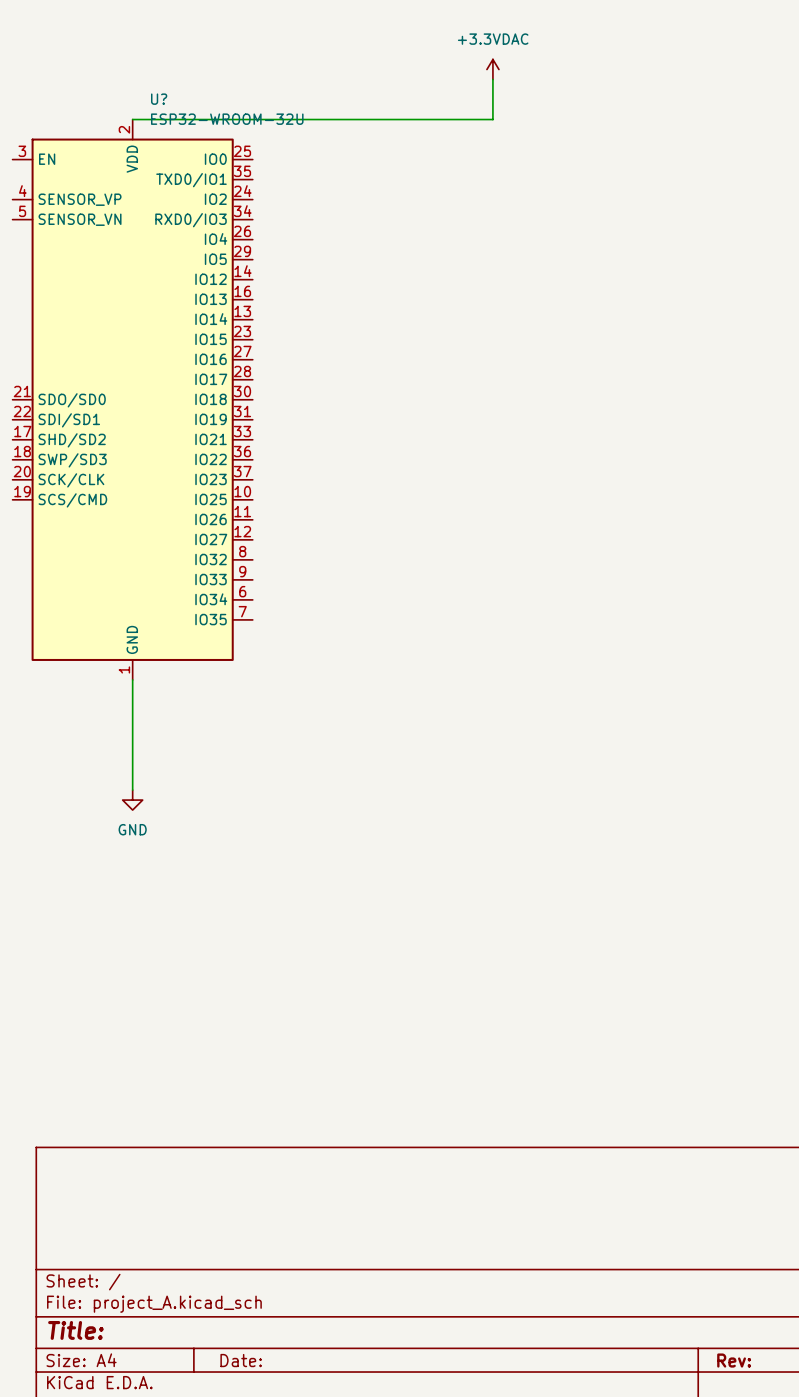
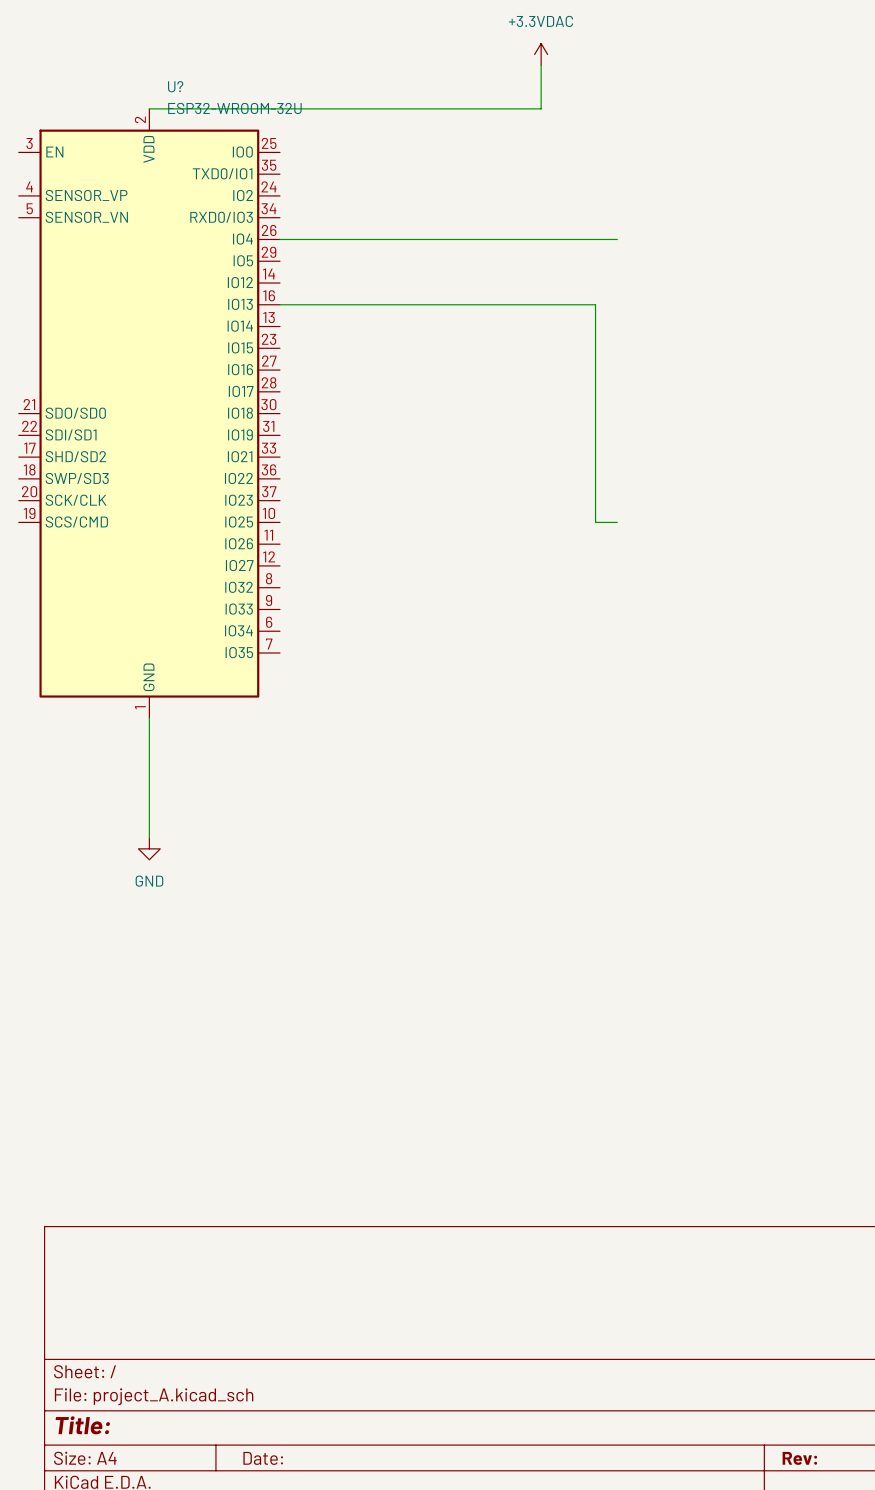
wire: none -> (279, 239) (617, 239)
wire: none -> (279, 304) (595, 304) (595, 522) (617, 522)

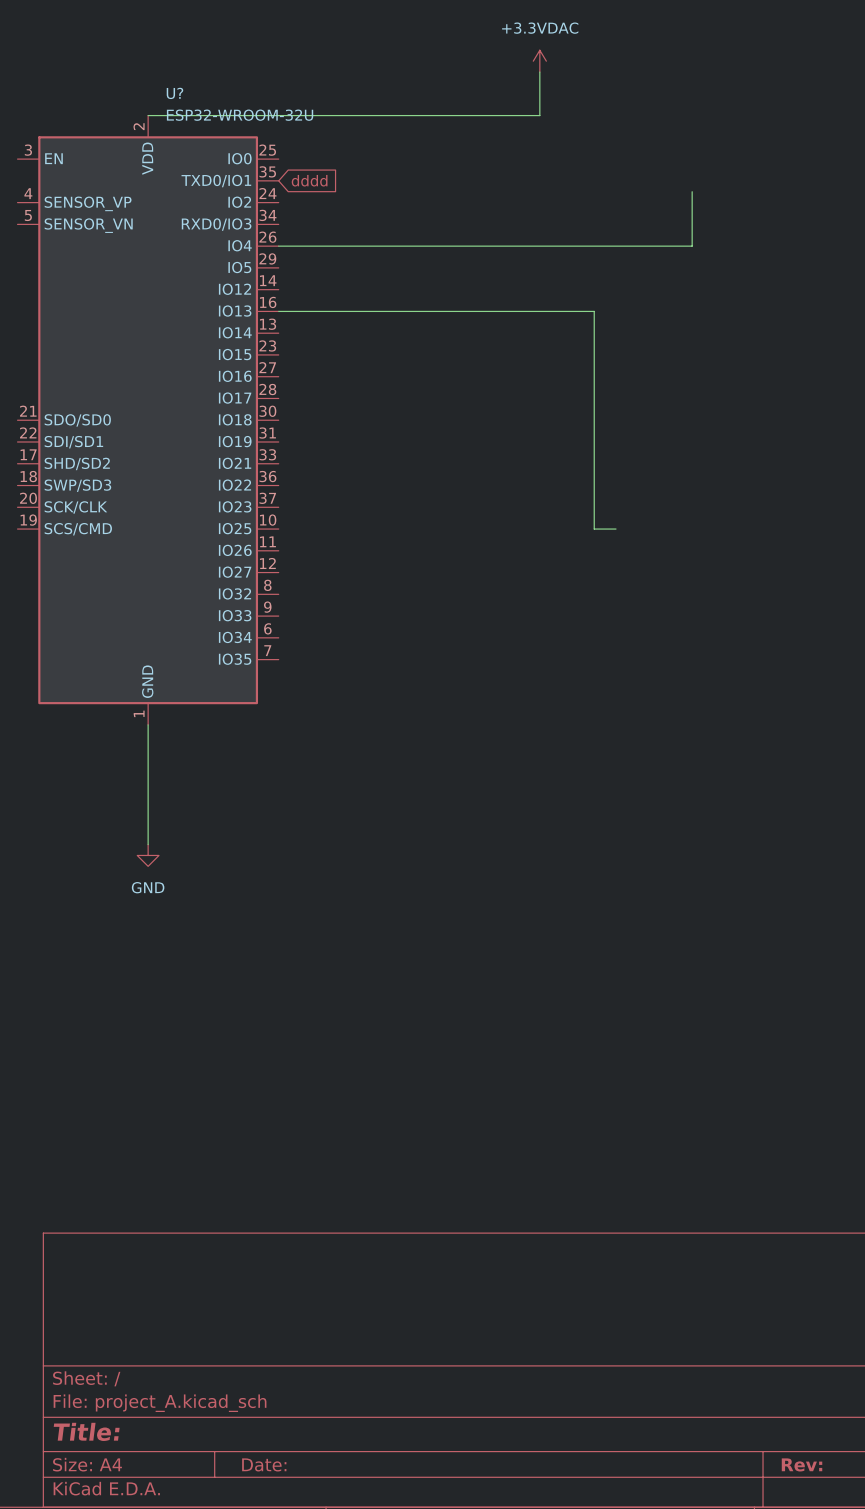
global label: none -> dddd (309, 180)
wire: none -> (692, 191) (692, 246) (616, 246)

